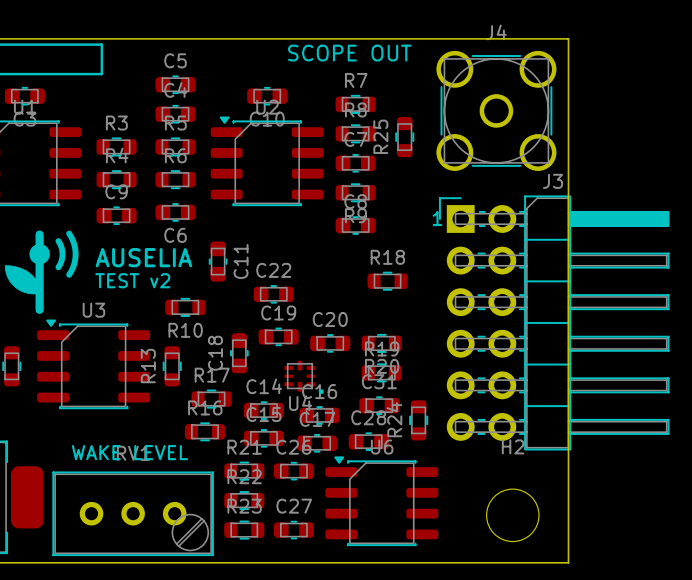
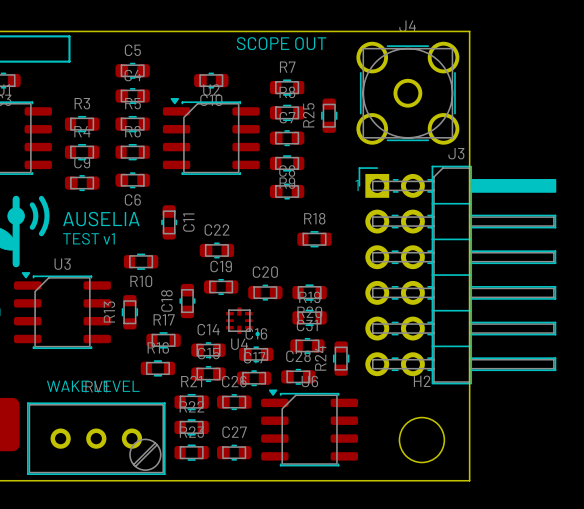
text: TEST v2 (132, 280) -> TEST v1 (88, 238)

